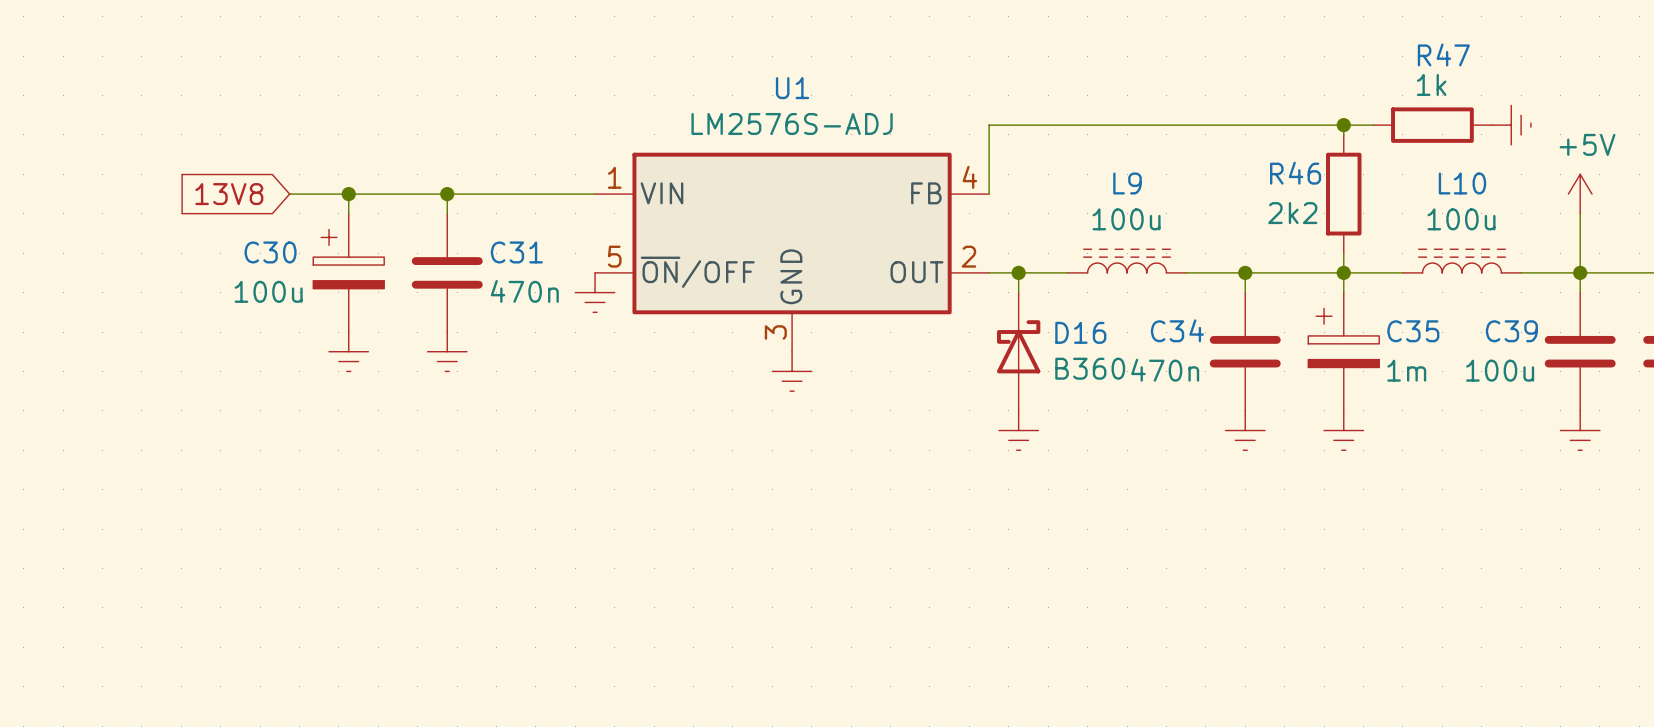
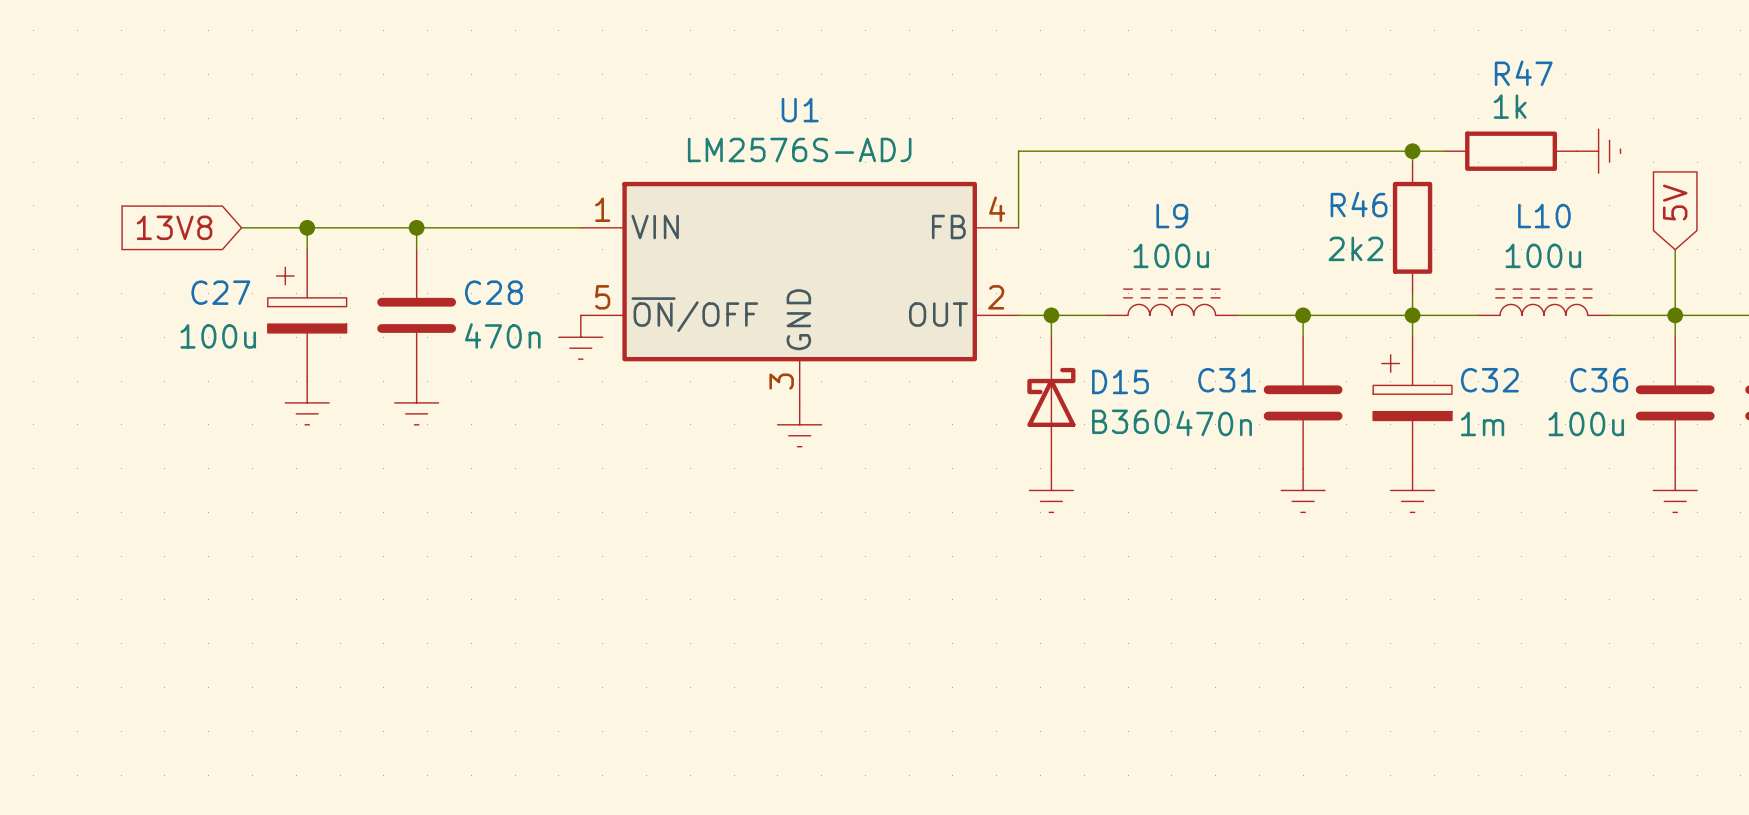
global label: none -> 5V (1675, 202)
power symbol: +5V (1580, 194) -> none
C30 name: C30 (270, 252) -> C27 (220, 292)
C31 name: C31 (516, 252) -> C28 (493, 292)
C34 name: C34 (1177, 330) -> C31 (1227, 380)
C35 name: C35 (1413, 331) -> C32 (1489, 380)
C39 name: C39 (1511, 331) -> C36 (1599, 380)
D16 name: D16 (1080, 332) -> D15 (1120, 381)

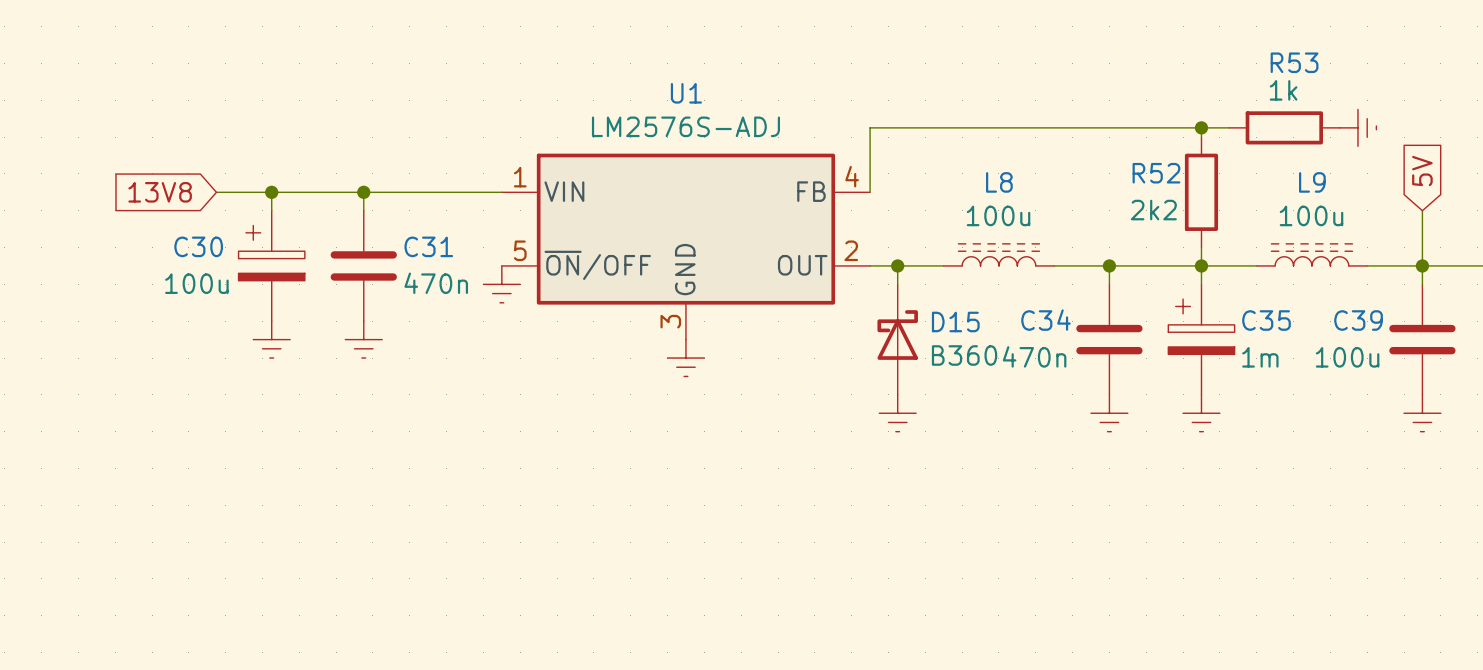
R47 name: R47 (1523, 73) -> R53 (1294, 62)
R46 name: R46 (1359, 204) -> R52 (1156, 173)
L9 name: L9 (1172, 216) -> L8 (999, 182)
L10 name: L10 (1544, 216) -> L9 (1312, 182)
C27 name: C27 (220, 292) -> C30 (198, 246)
C28 name: C28 (493, 292) -> C31 (428, 246)
C31 name: C31 (1227, 380) -> C34 (1046, 320)
C32 name: C32 (1489, 380) -> C35 (1266, 320)
C36 name: C36 (1599, 380) -> C39 (1358, 320)

